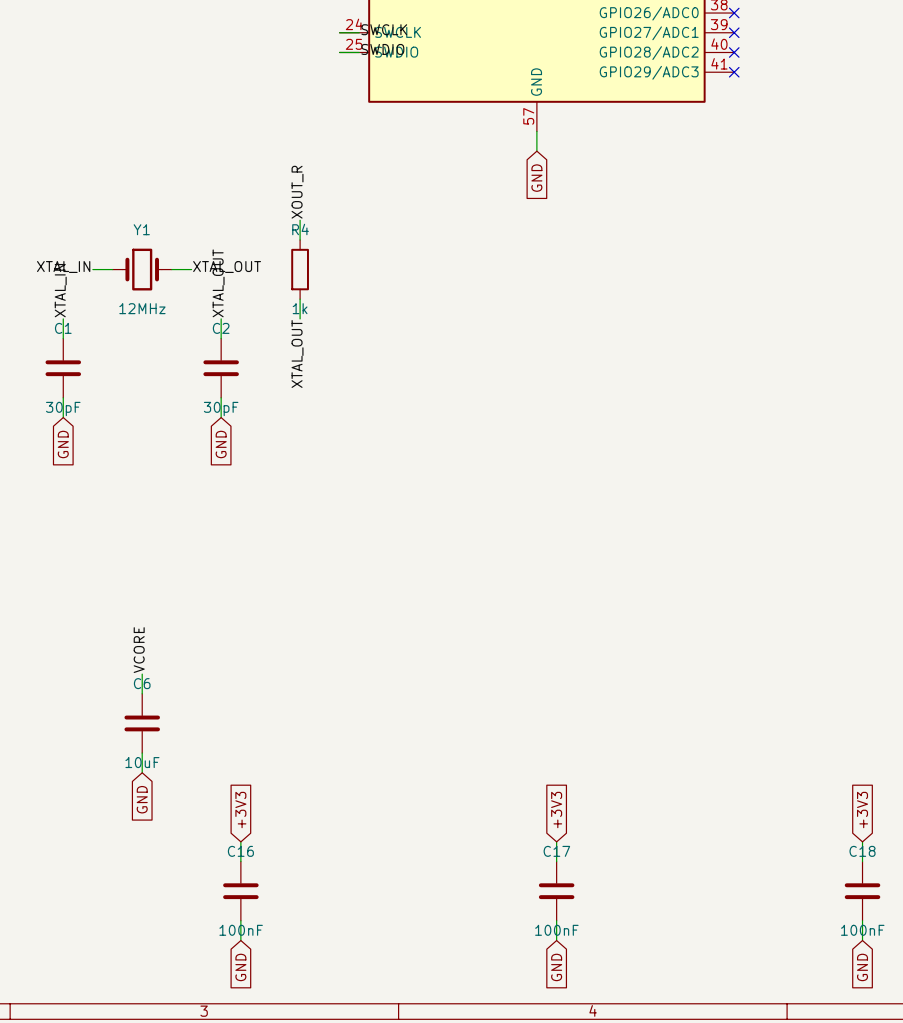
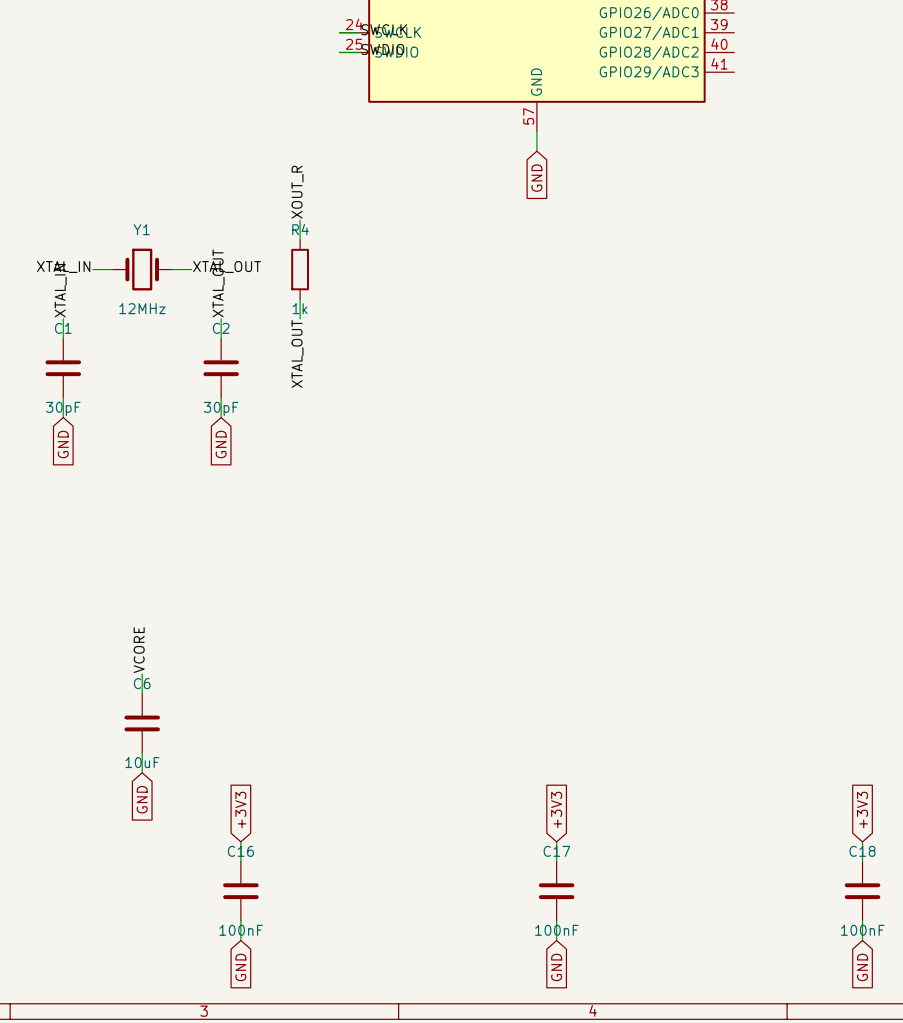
no-connect mark: (734, 13) -> none
no-connect mark: (734, 32) -> none
no-connect mark: (734, 52) -> none
no-connect mark: (734, 72) -> none

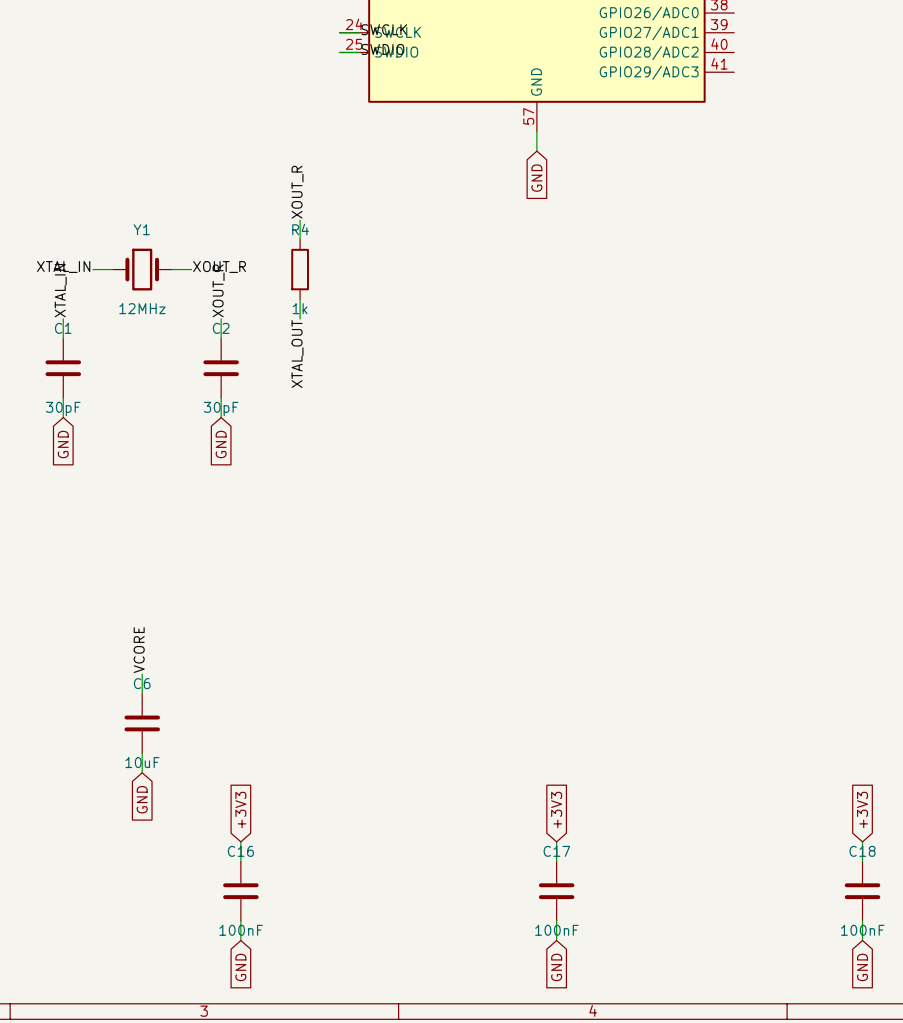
label: XTAL_OUT (227, 267) -> XOUT_R (219, 267)
label: XTAL_OUT (218, 283) -> XOUT_R (218, 290)

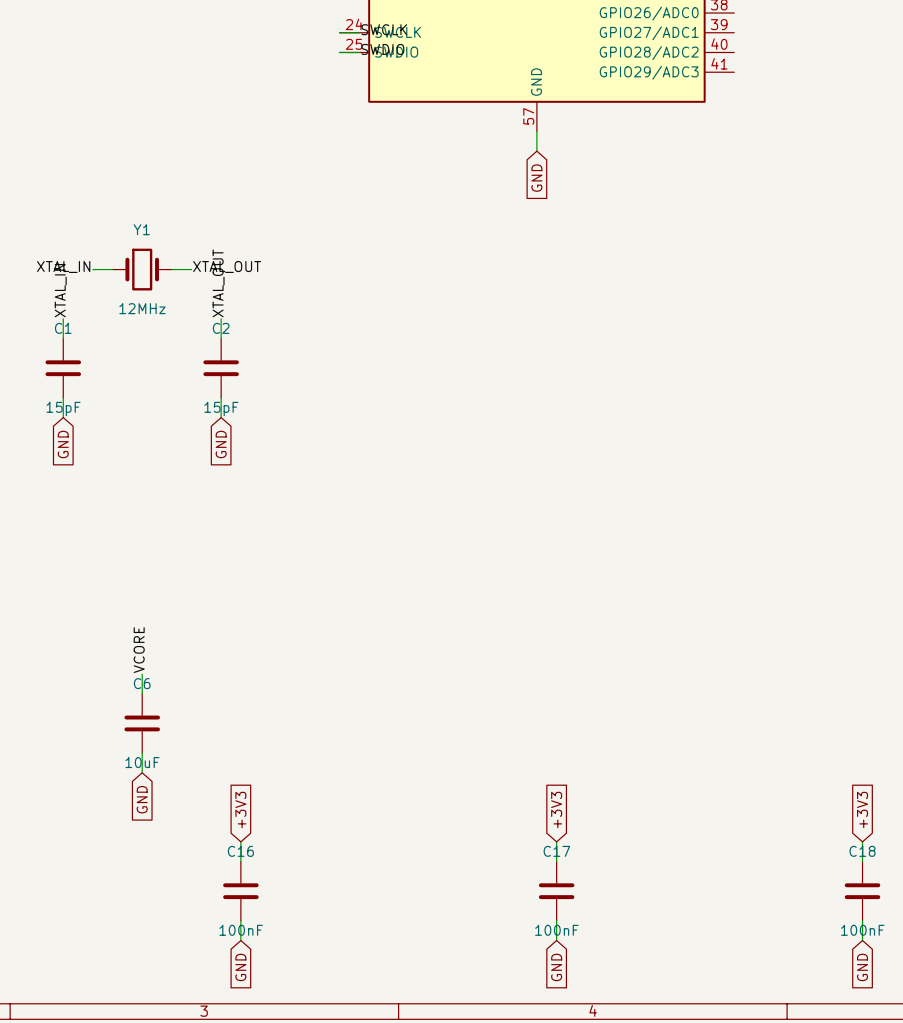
label: XOUT_R (297, 192) -> none
wire: (300, 220) (300, 239) -> none
label: XOUT_R (219, 267) -> XTAL_OUT (227, 267)
R4: 1k (300, 269) -> none
label: XOUT_R (218, 290) -> XTAL_OUT (218, 283)
wire: (300, 299) (300, 318) -> none
label: XTAL_OUT (297, 353) -> none
C1 value: 30pF (63, 408) -> 15pF (63, 408)
C2 value: 30pF (221, 408) -> 15pF (221, 408)

